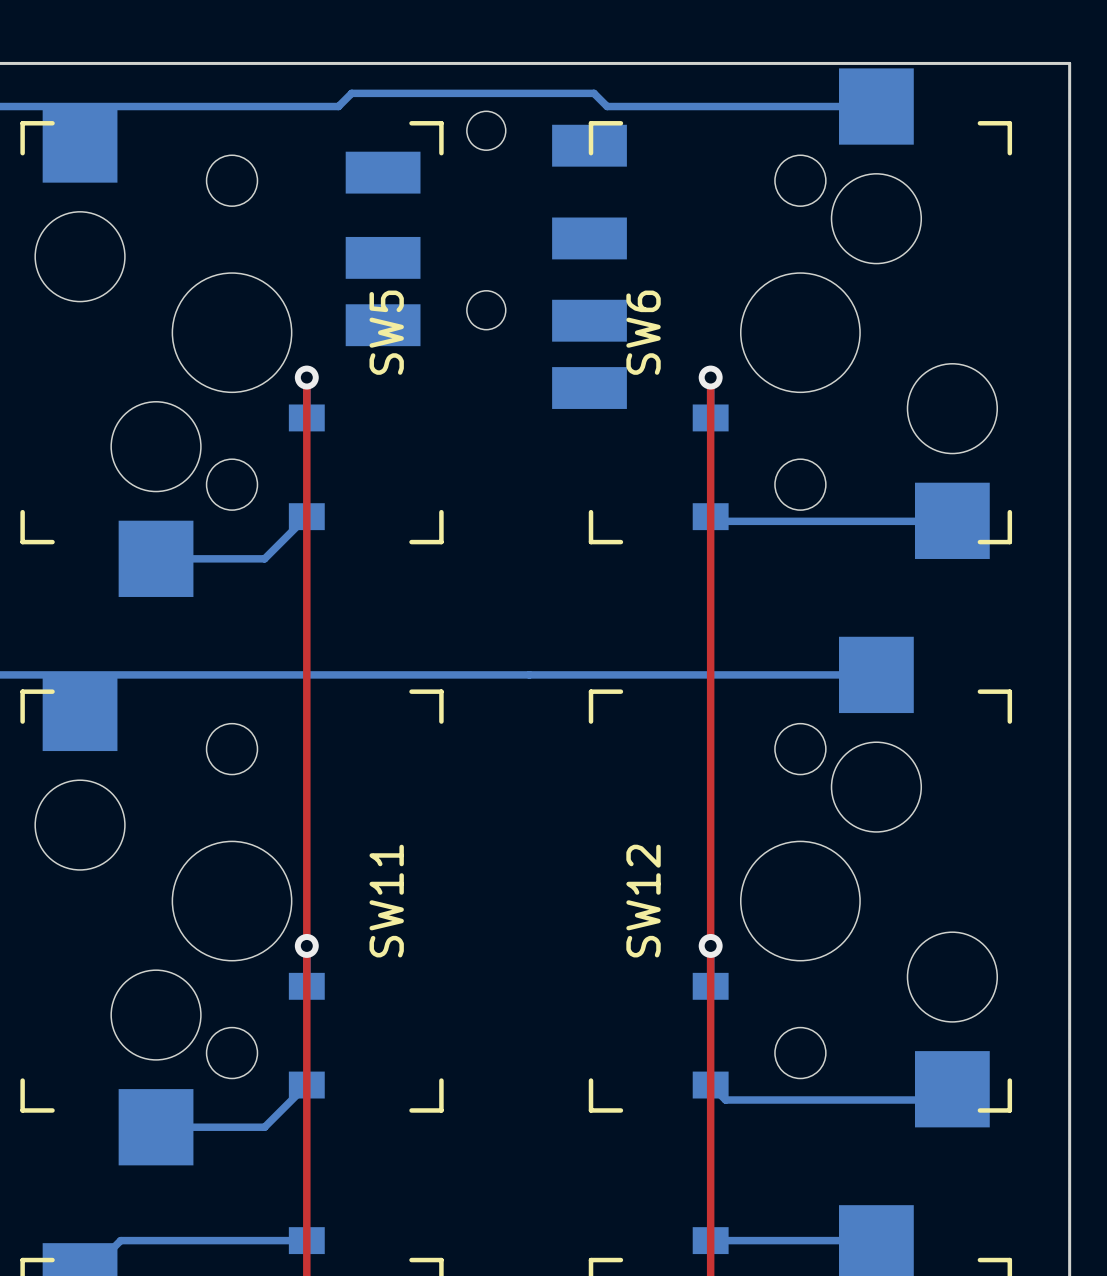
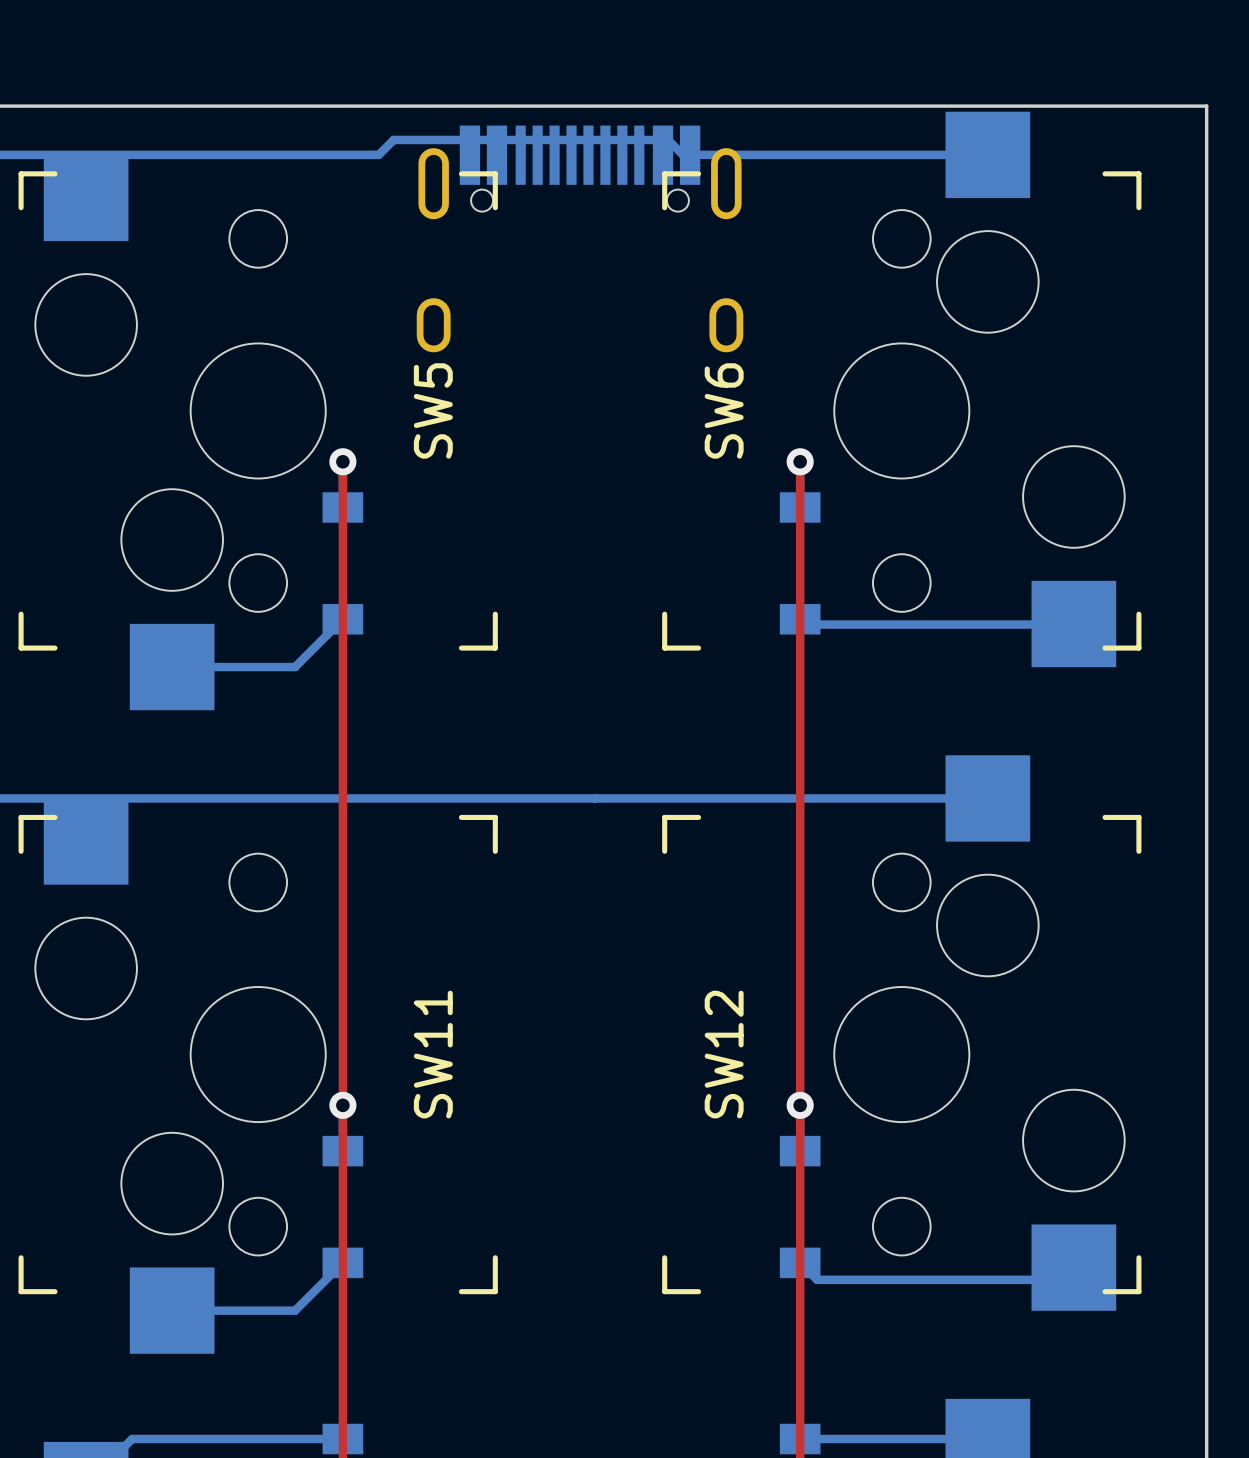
part: none -> (580, 238)
part: (486, 260) -> none

